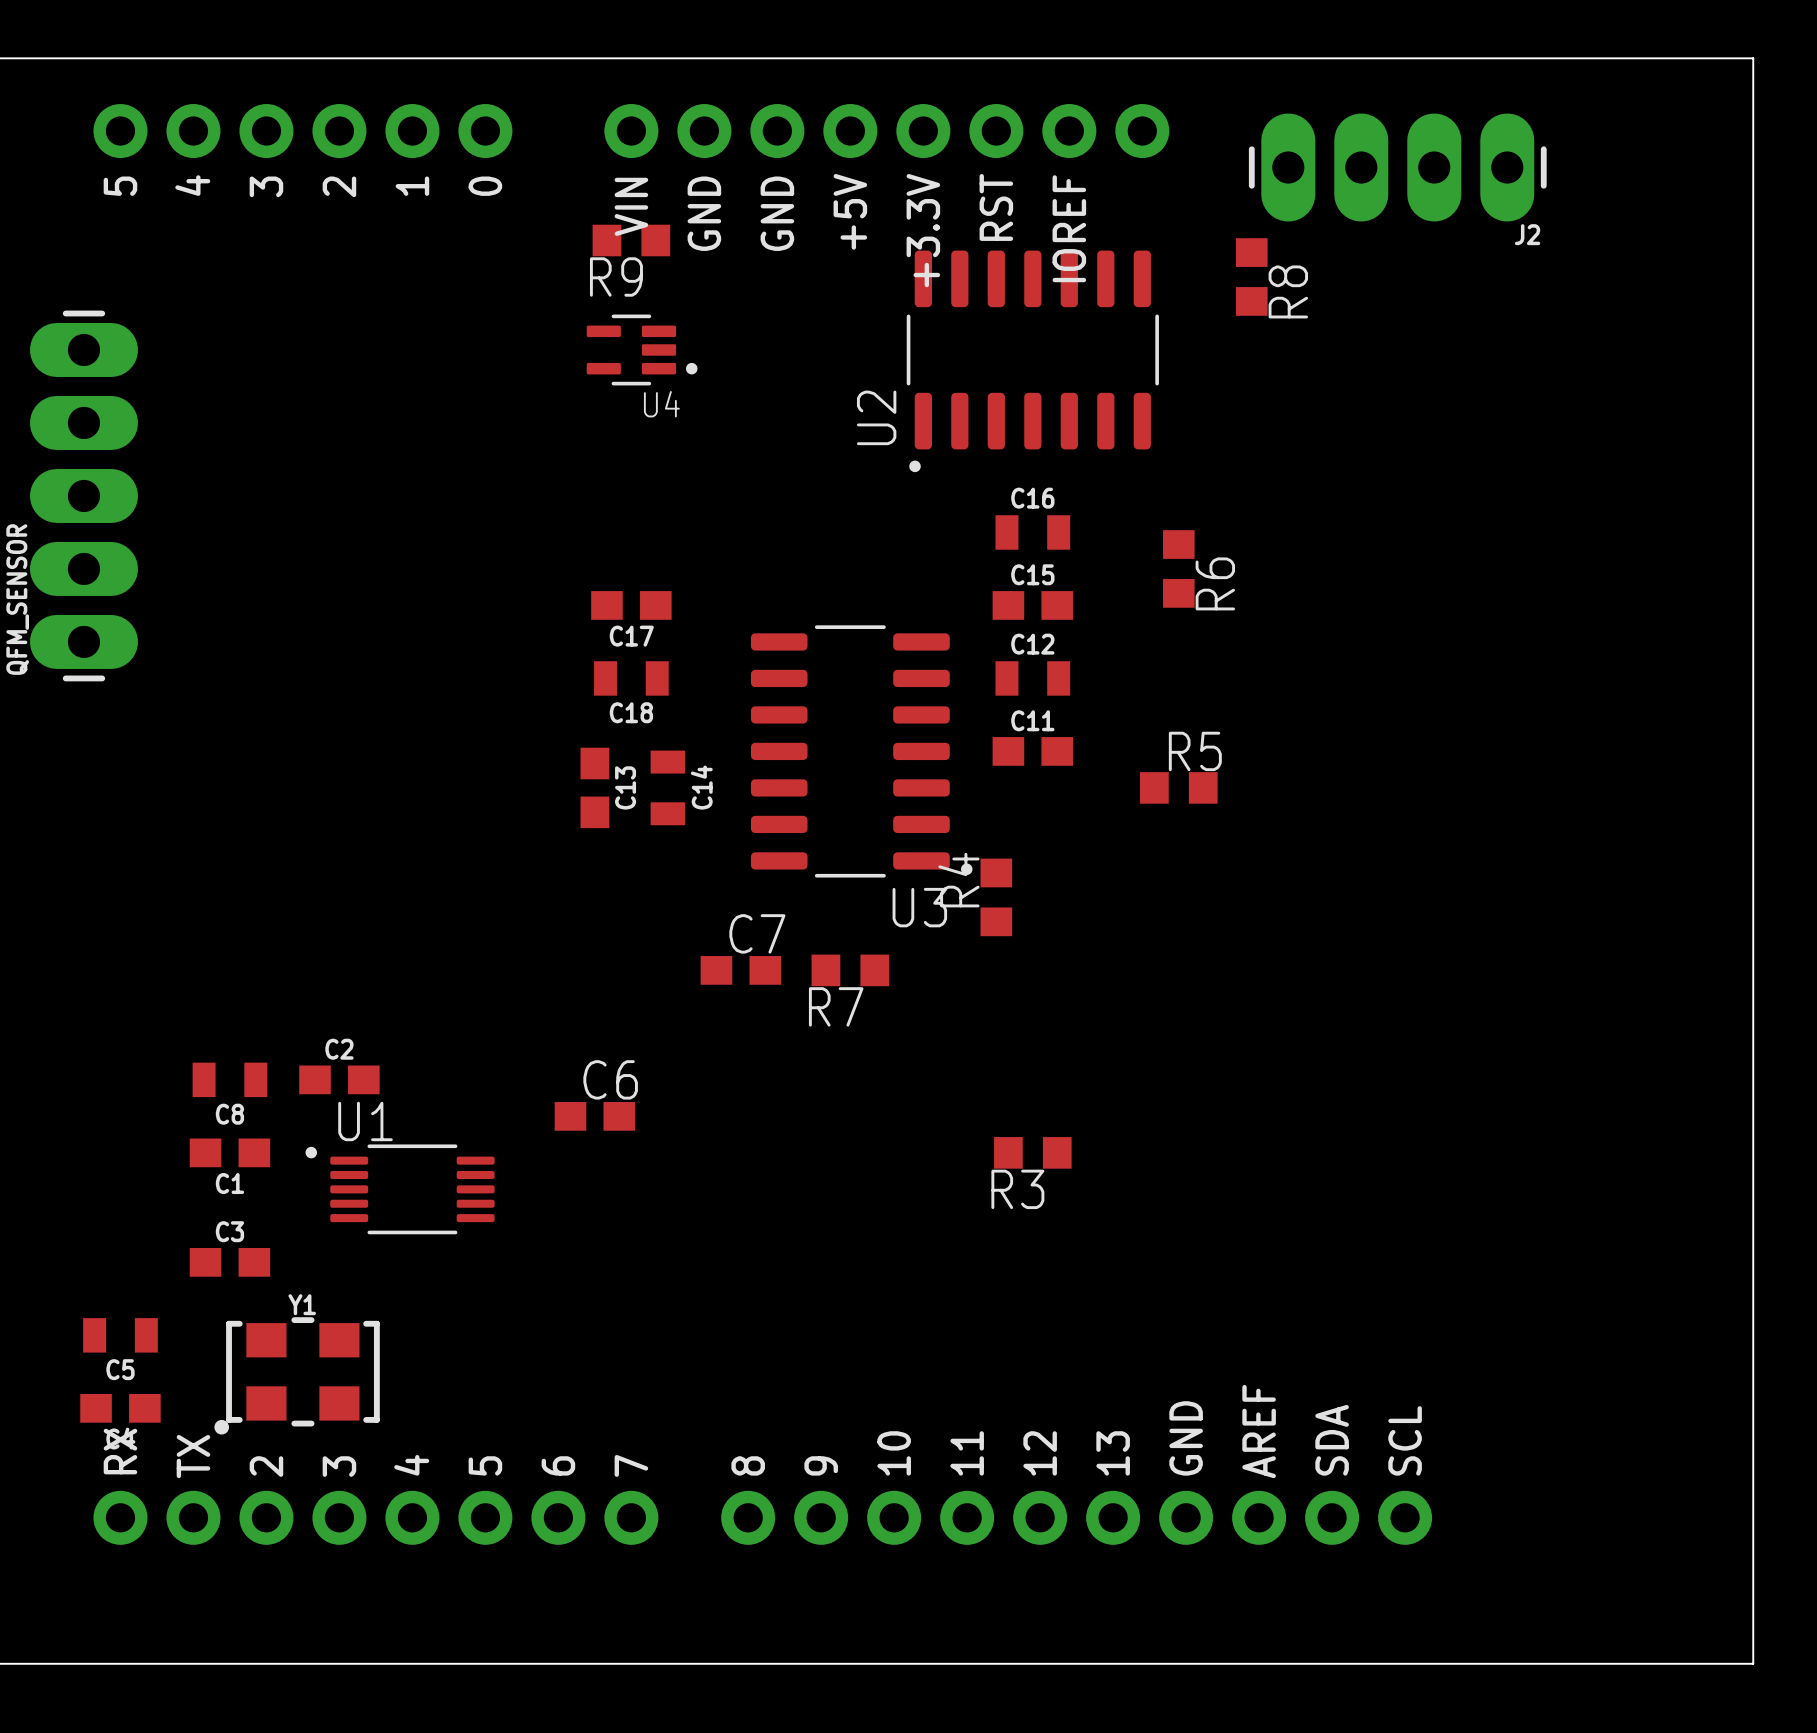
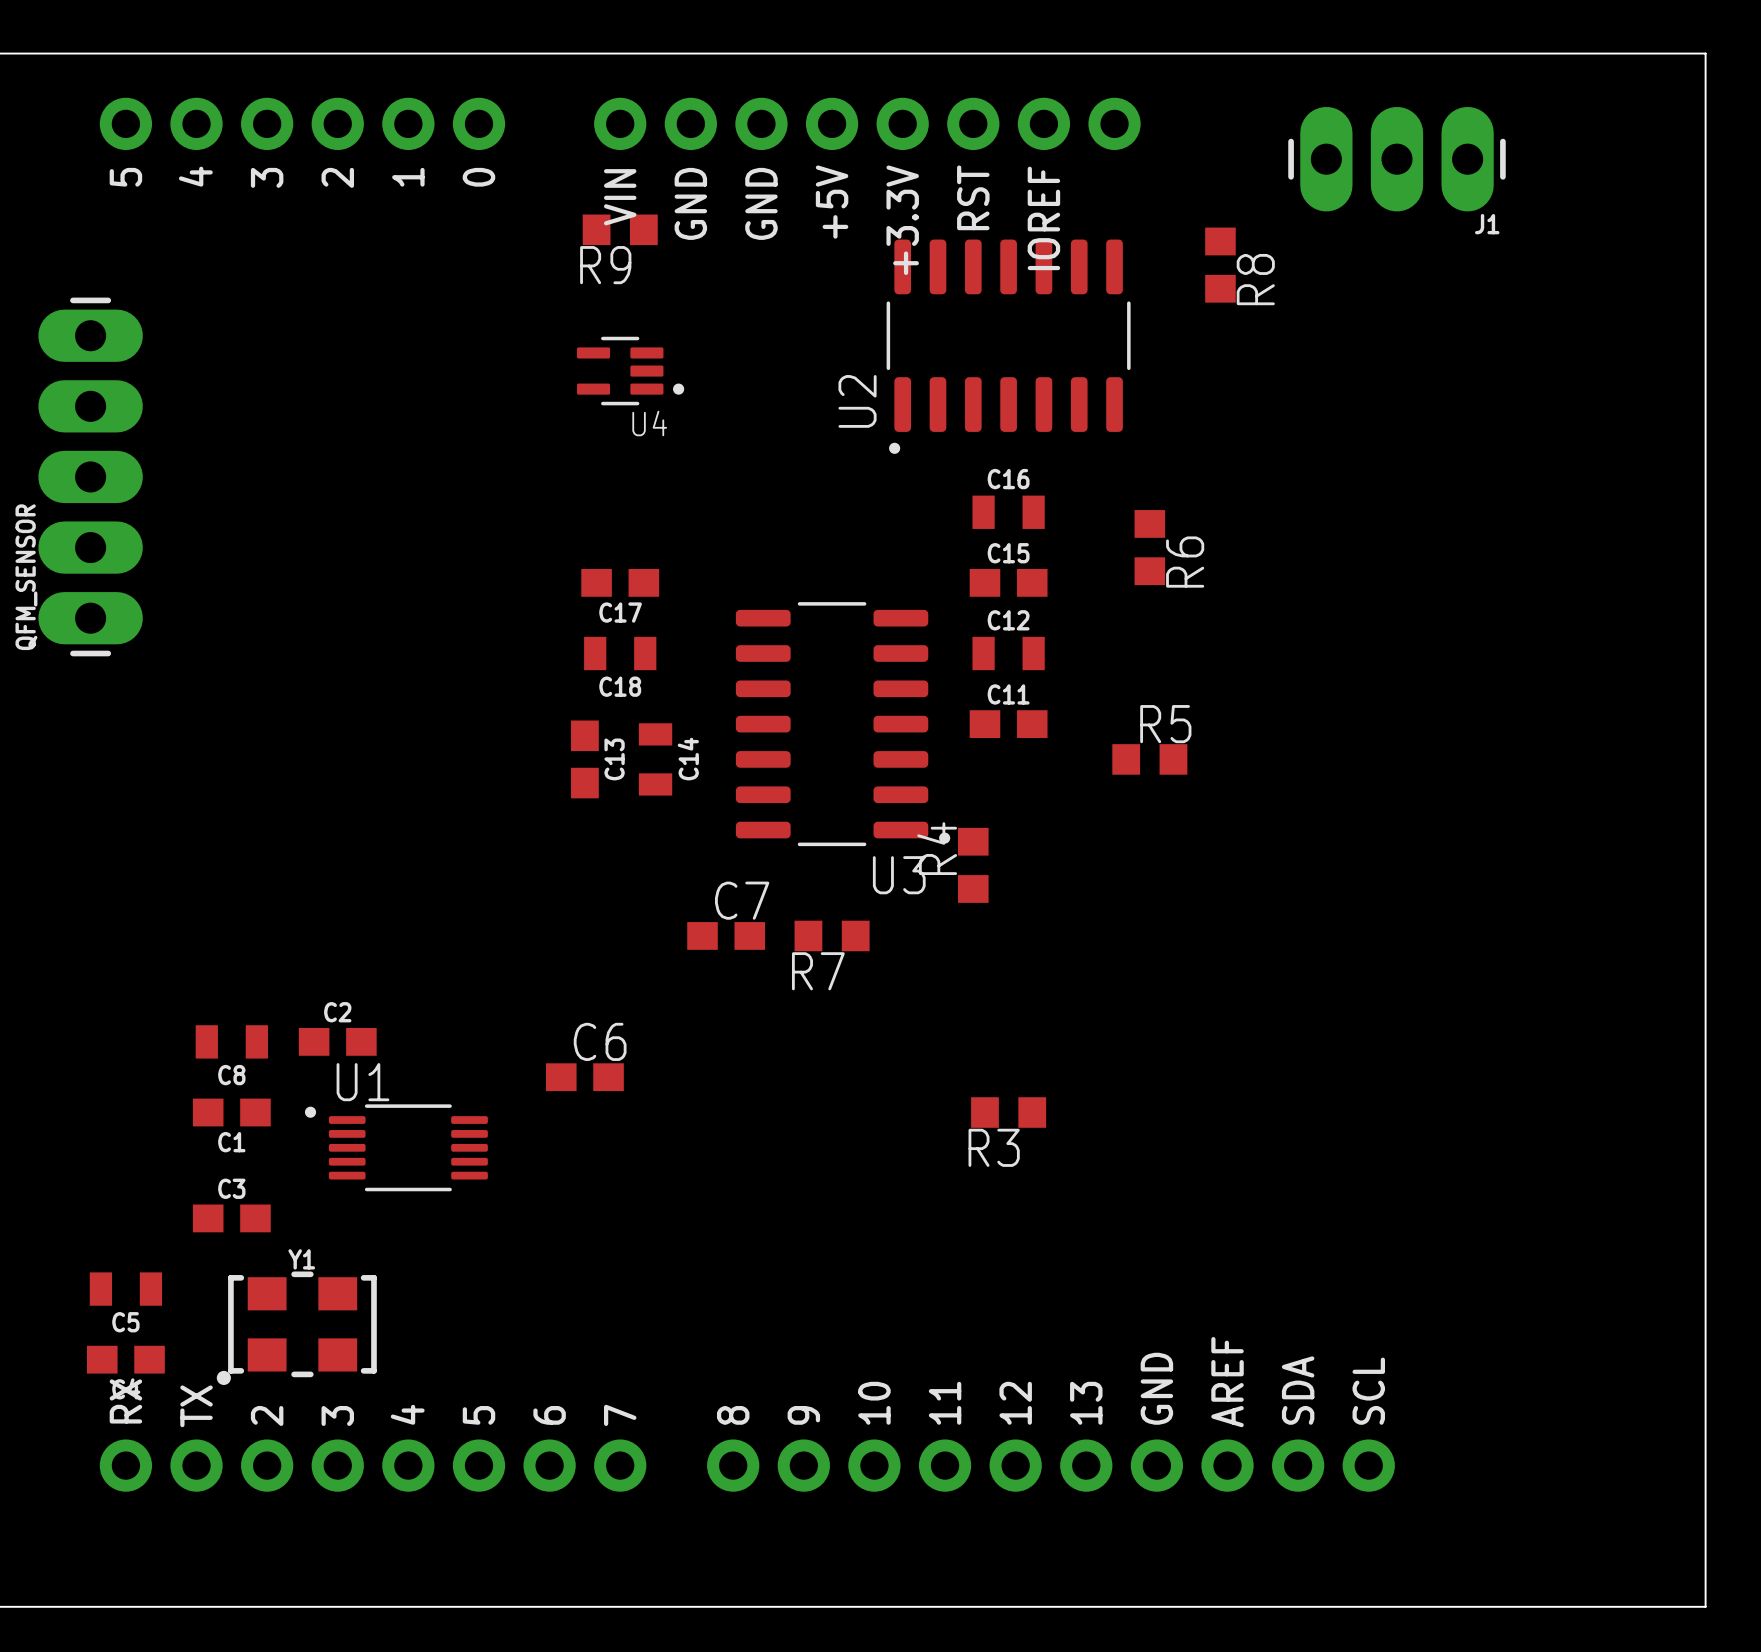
J2: (1397, 167) -> none
J1: none -> (1397, 159)
U4 position: (642, 349) -> (630, 371)

